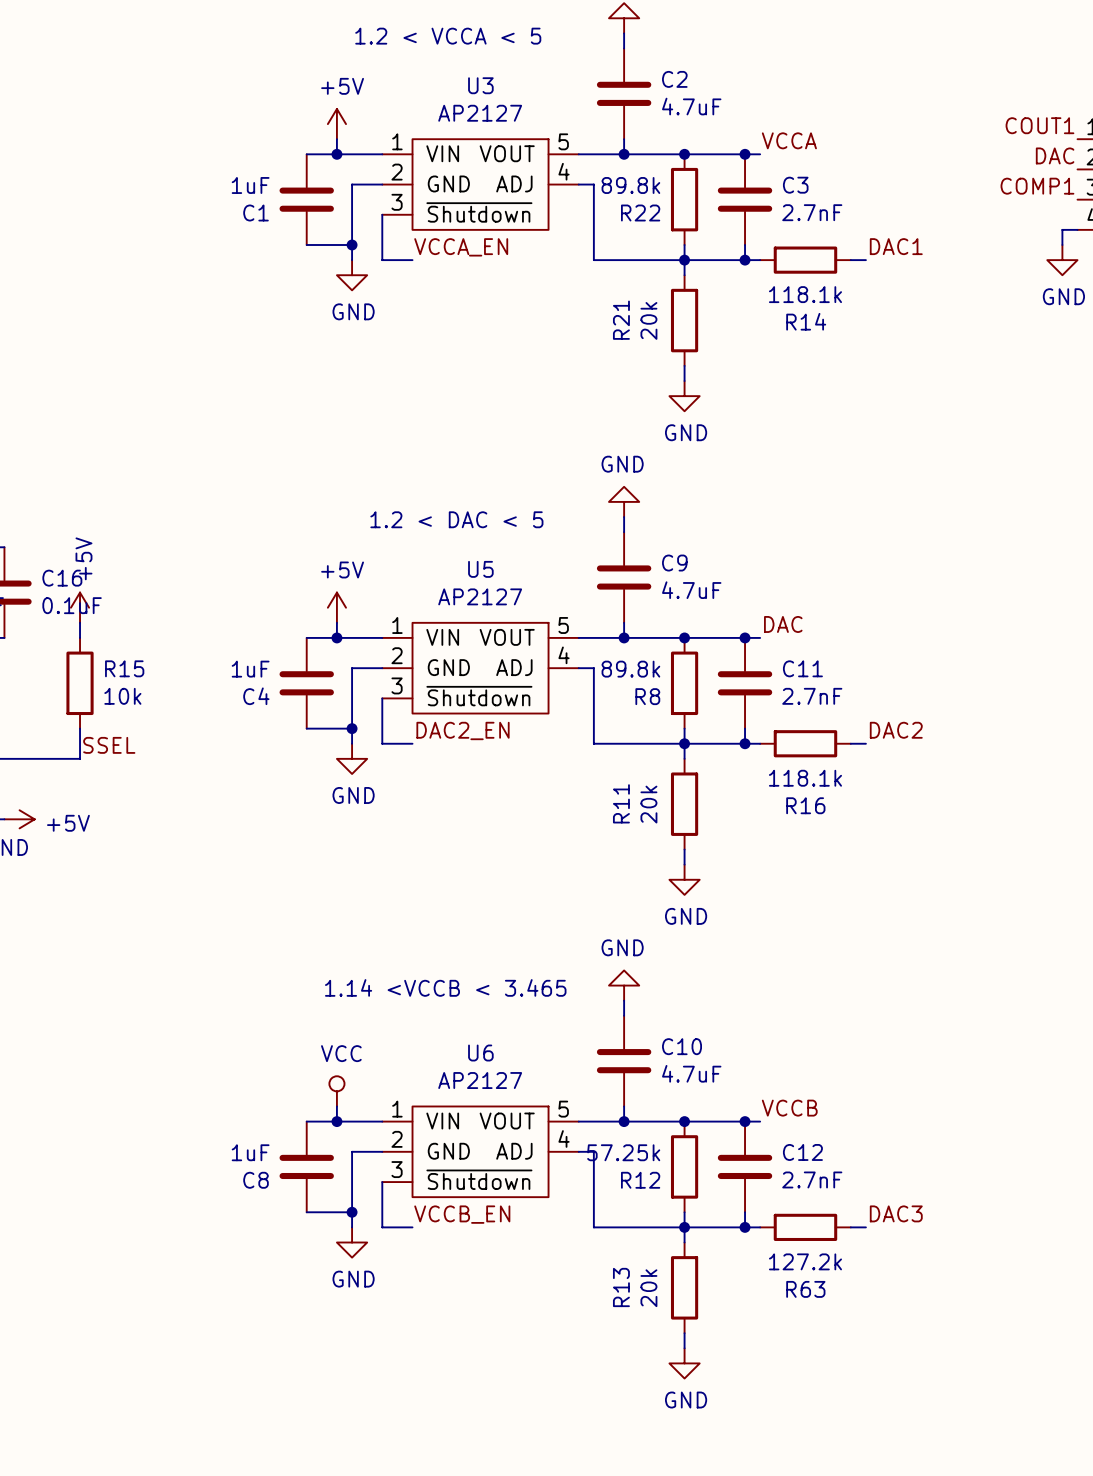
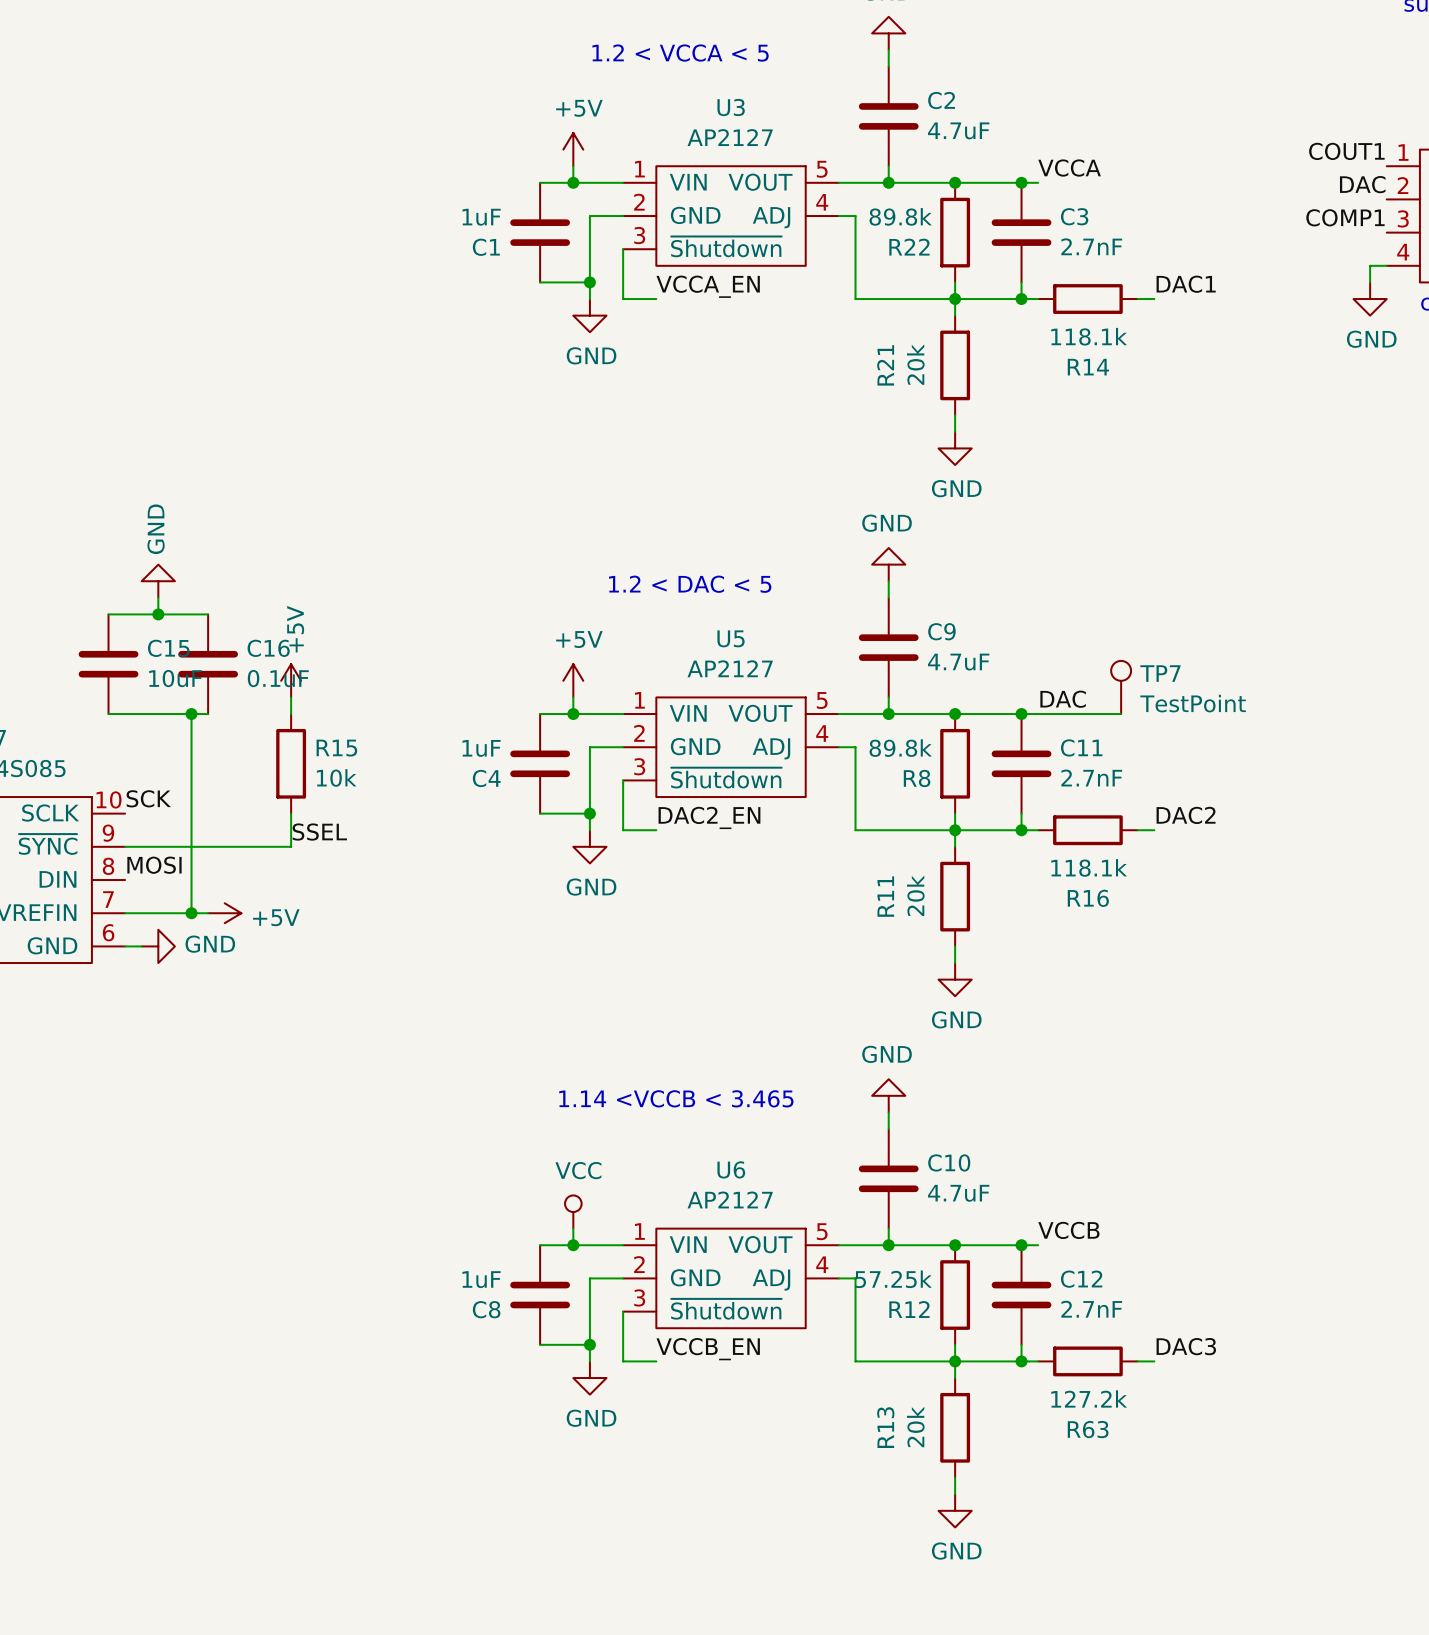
TP7: none -> TestPoint (1121, 687)
wire: none -> (1038, 714) (1121, 714)

